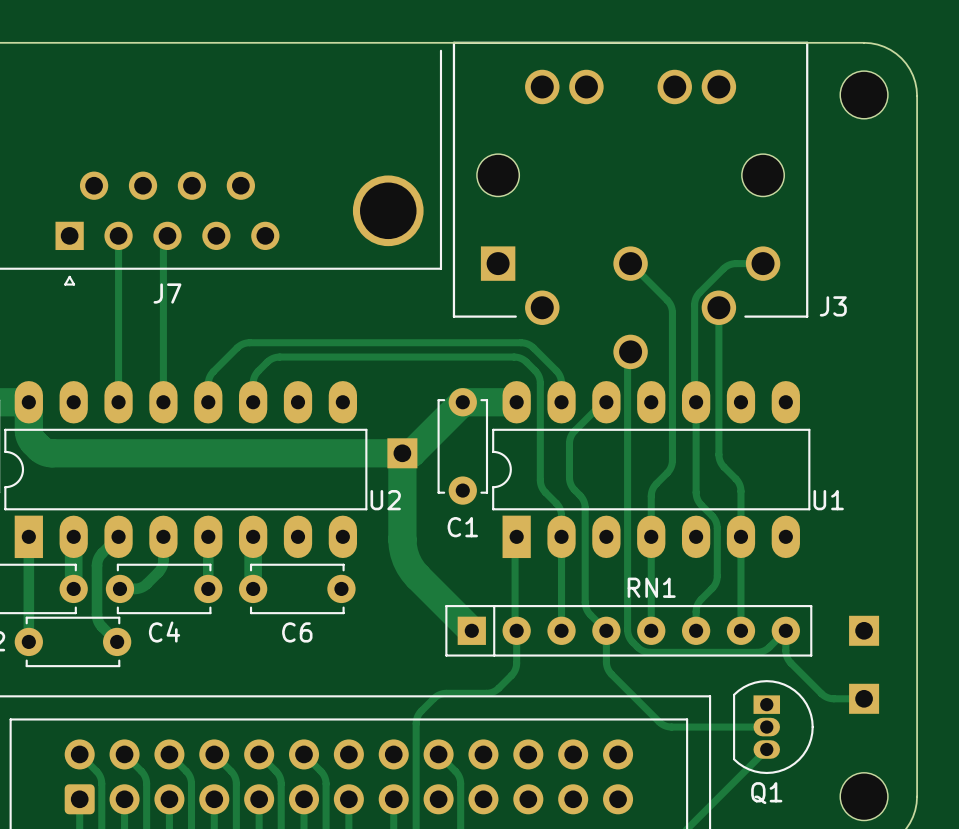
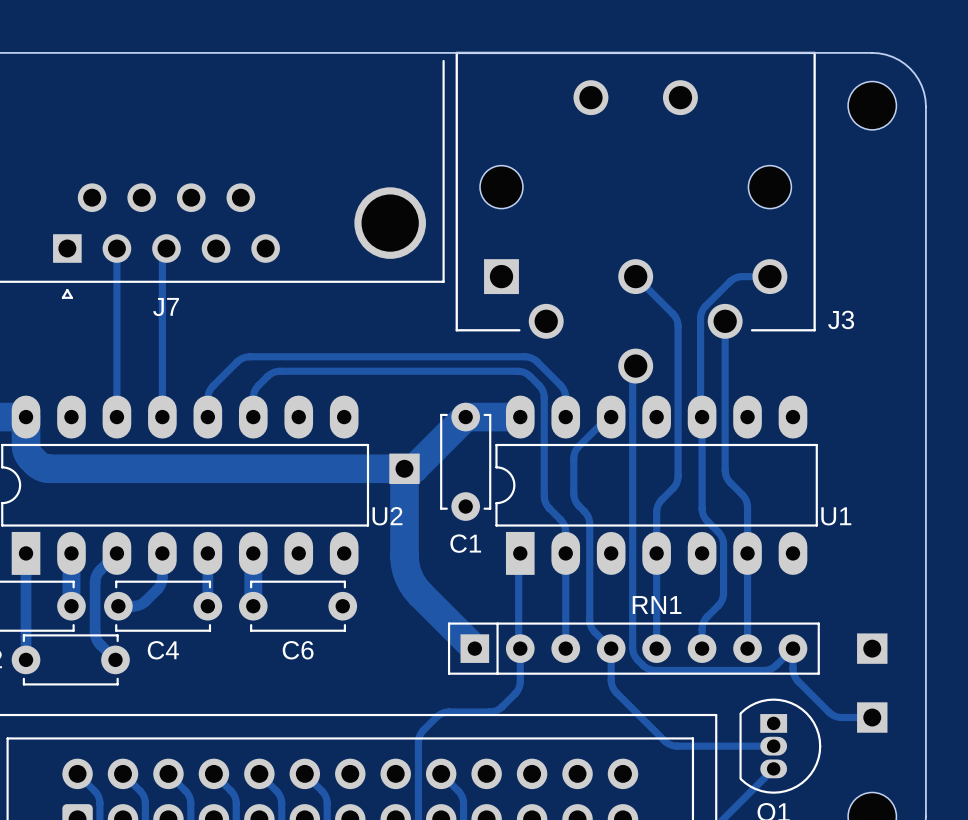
J3 footprint: [452, 41, 809, 370] -> [455, 51, 816, 384]

